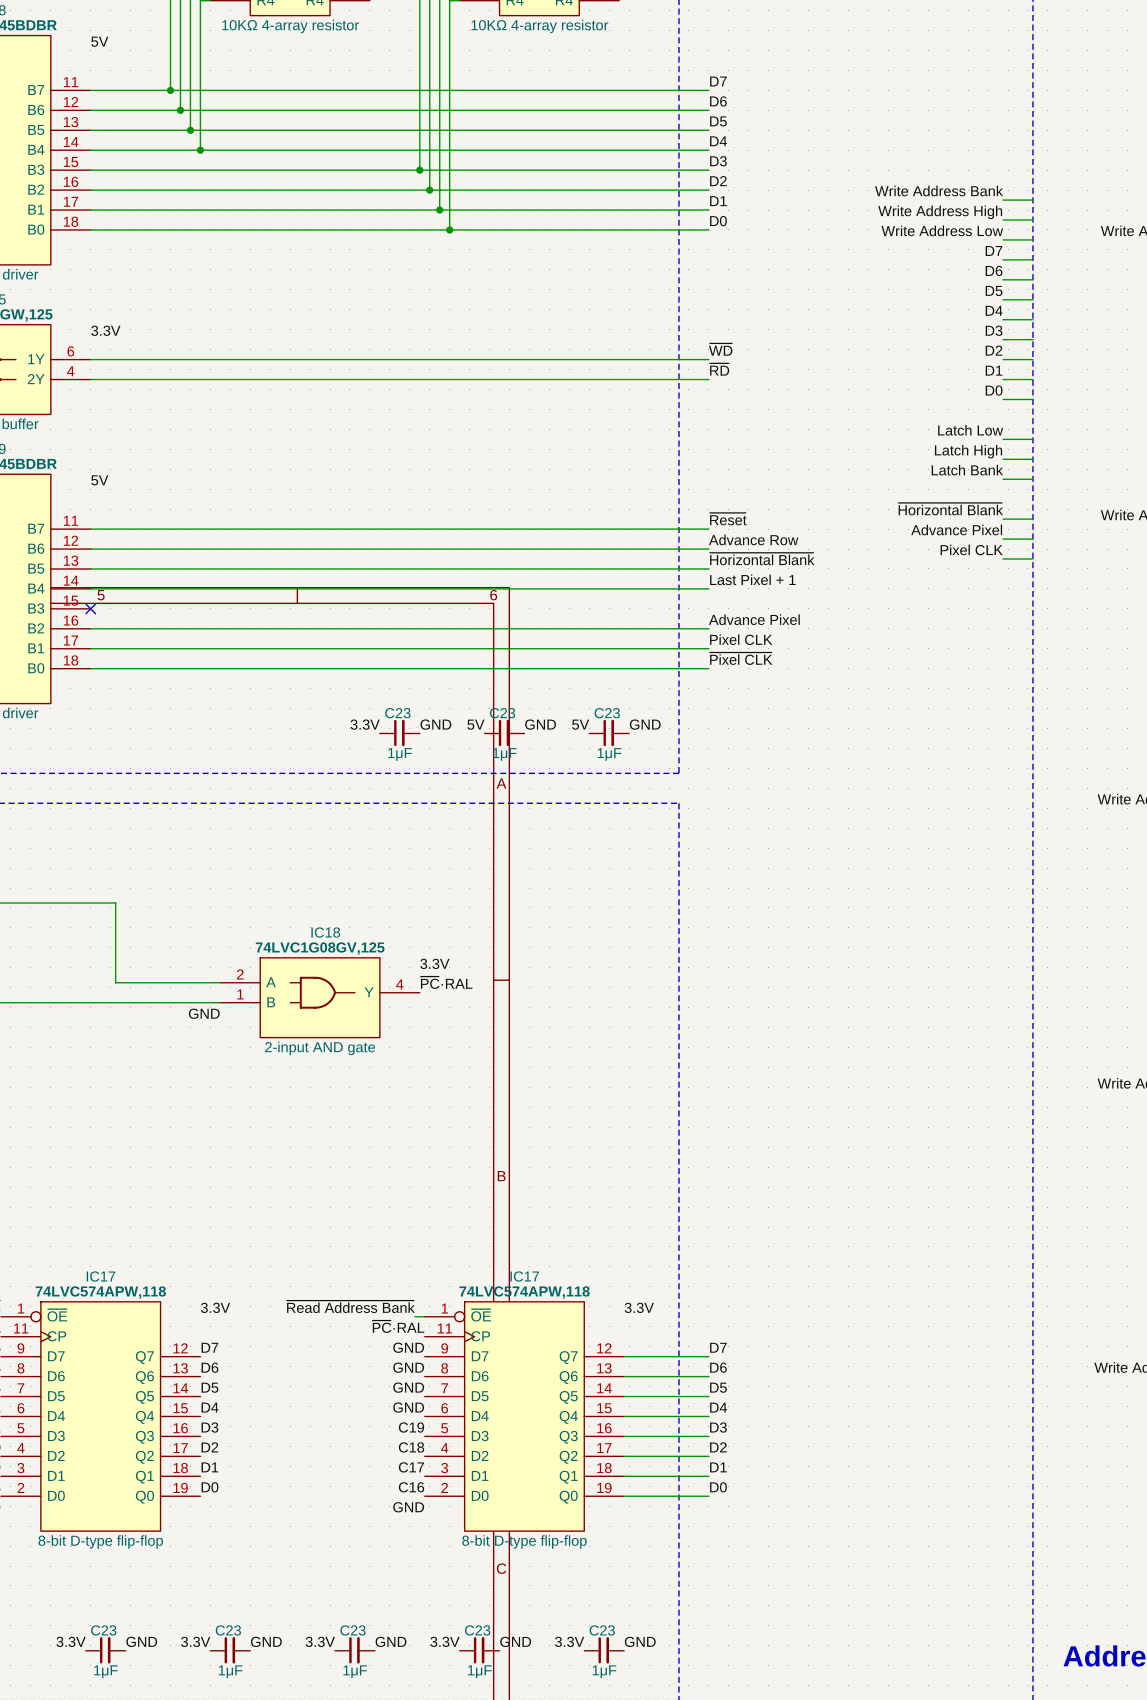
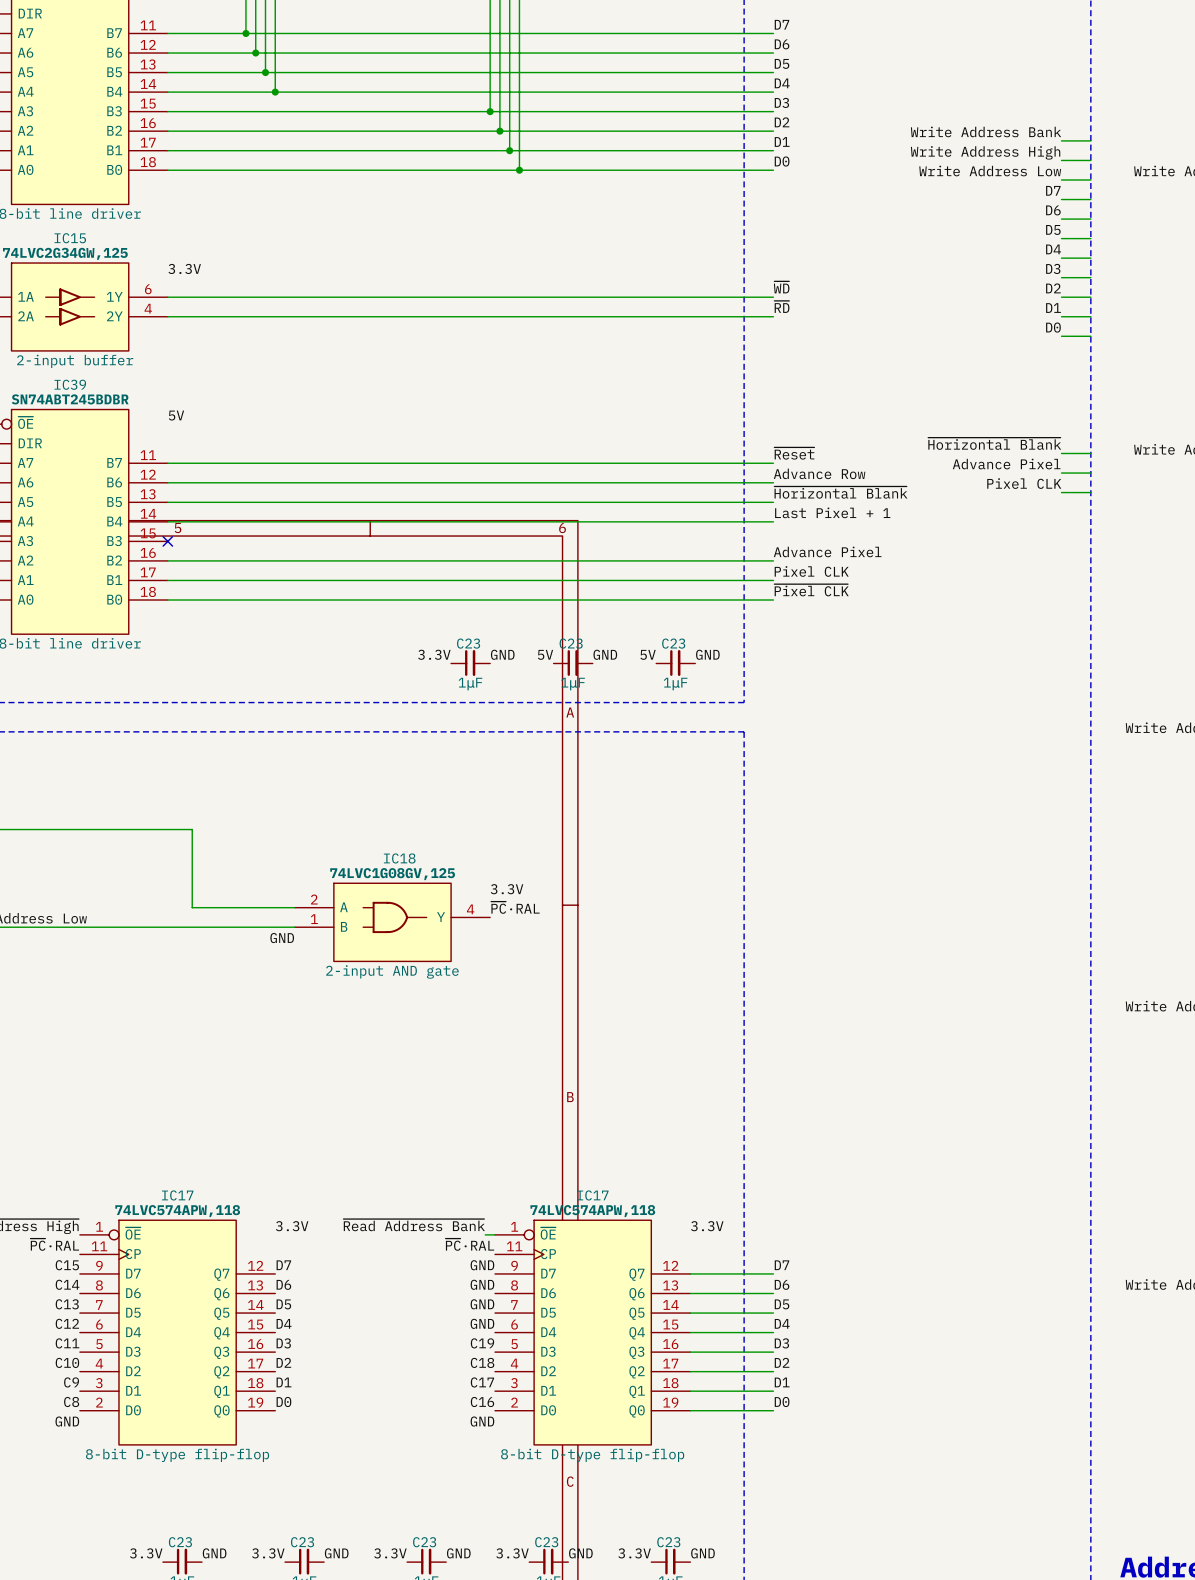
label: Latch Low (970, 430) -> none
wire: (1003, 439) (1032, 439) -> none
label: Latch High (968, 451) -> none
wire: (1003, 459) (1032, 459) -> none
label: Latch Bank (967, 470) -> none
wire: (1003, 479) (1032, 479) -> none

